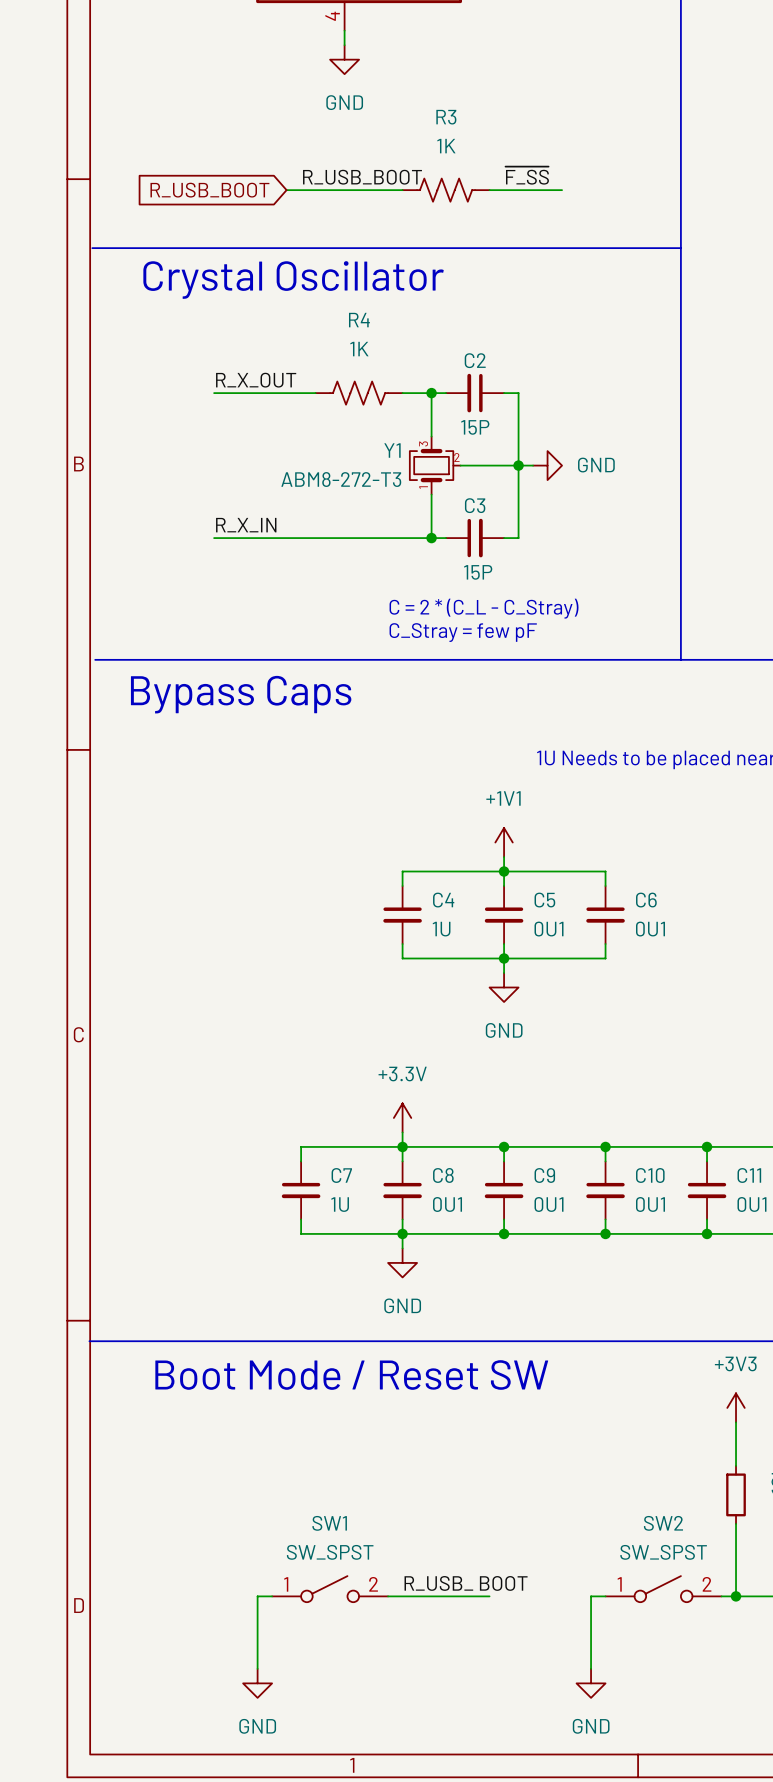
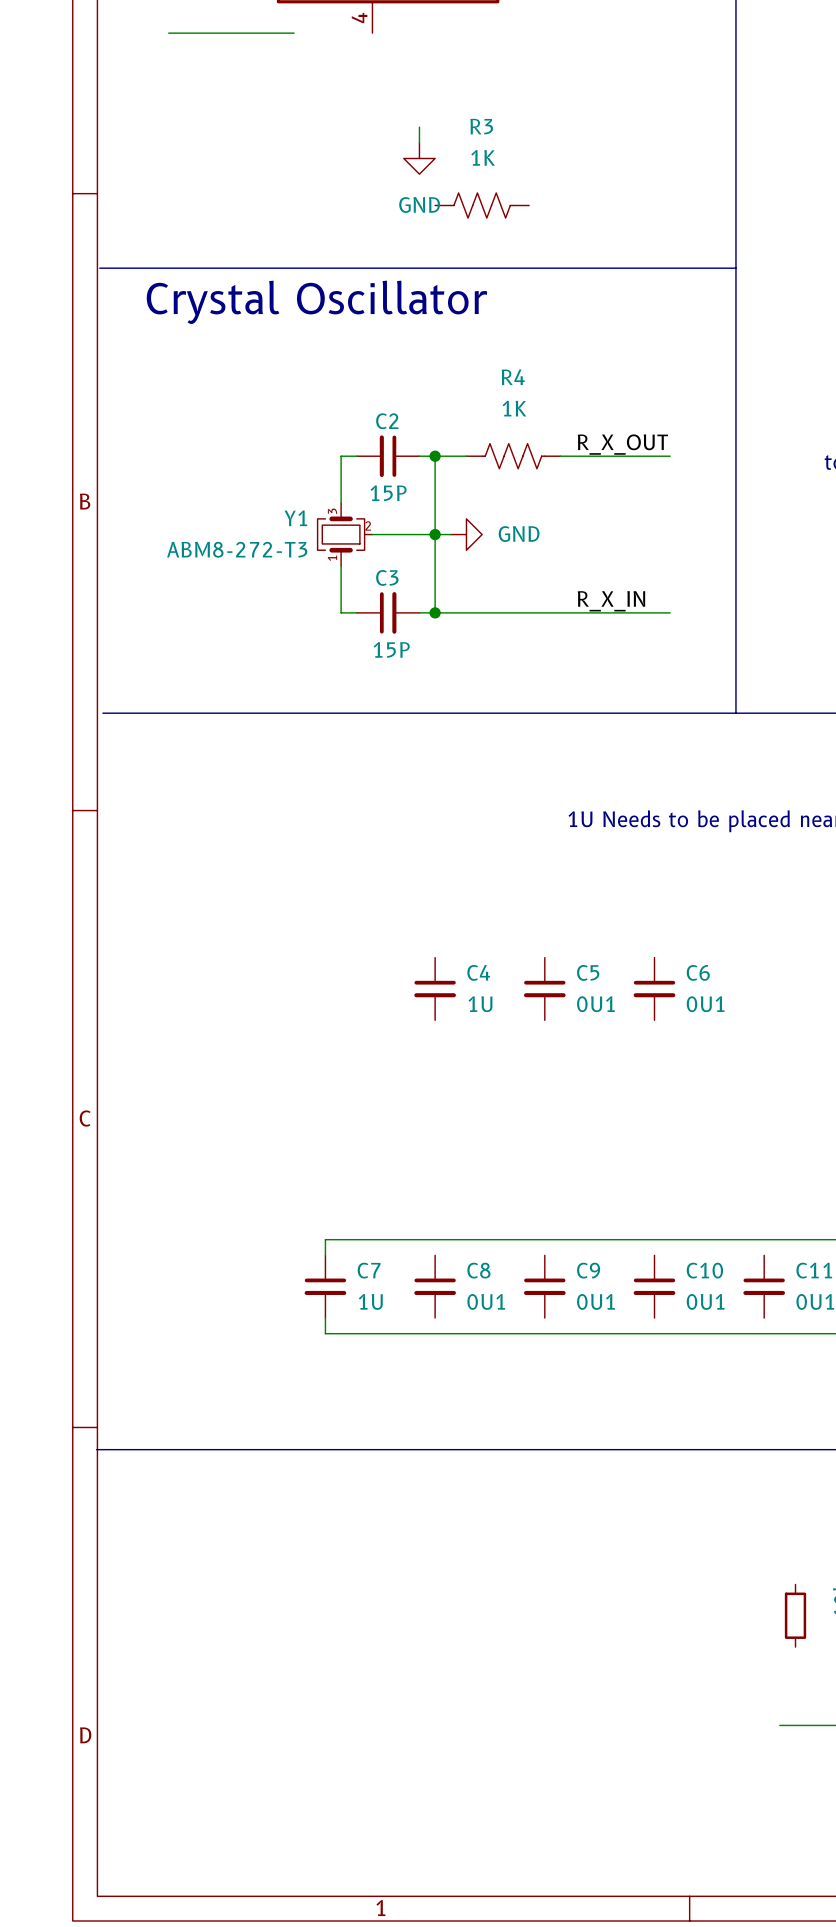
wire: (344, 30) (344, 45) -> (419, 127) (419, 142)
power symbol position: GND (344, 59) -> GND (419, 158)
label: ~{F_SS} (527, 175) -> none
label: R_USB_BOOT (362, 177) -> none
global label: R_USB_BOOT (209, 190) -> none
wire: (286, 190) (402, 190) -> (168, 33) (294, 33)
wire: (489, 190) (562, 190) -> none
label: R_X_OUT (256, 380) -> none
wire: (214, 393) (315, 393) -> none
R4 position: (359, 393) -> (513, 456)
wire: (402, 393) (446, 393) -> (419, 456) (466, 456)
wire: (431, 393) (431, 436) -> none
junction position: (431, 393) -> (435, 456)
C2 position: (475, 393) -> (388, 456)
wire: (504, 393) (518, 393) (518, 538) (504, 538) -> none
label: none -> R_X_OUT (622, 444)
wire: none -> (356, 456) (341, 456) (341, 503)
wire: none -> (435, 456) (435, 612)
wire: none -> (560, 456) (670, 456)
Y1 position: (435, 465) -> (345, 534)
wire: (460, 465) (533, 465) -> (372, 534) (450, 534)
junction: (518, 465) -> none
power symbol position: GND (547, 465) -> GND (466, 534)
junction: none -> (435, 534)
wire: (431, 494) (431, 538) -> none
wire: none -> (341, 565) (341, 612) (356, 612)
label: R_X_IN (246, 525) -> none
wire: (214, 538) (446, 538) -> (419, 612) (670, 612)
junction: (431, 538) -> none
C3 position: (475, 538) -> (388, 612)
label: none -> R_X_IN (611, 601)
junction: none -> (435, 612)
text: C = 2 * (C_L - C_Stray) (484, 608) -> none
text: C_Stray = few pF (463, 632) -> none
text: Bypass Caps (241, 694) -> none
power symbol: +1V1 (504, 842) -> none
wire: (504, 857) (504, 886) -> none
junction: (504, 871) -> none
wire: (402, 886) (402, 871) (605, 871) (605, 886) -> none
wire: (402, 944) (402, 958) (605, 958) (605, 944) -> none
wire: (504, 944) (504, 972) -> none
junction: (504, 958) -> none
power symbol: GND (504, 987) -> none
power symbol: +3.3V (402, 1117) -> none
wire: (402, 1132) (402, 1161) -> none
junction: (402, 1146) -> none
wire: (504, 1146) (504, 1161) -> none
junction: (504, 1146) -> none
wire: (605, 1146) (605, 1161) -> none
junction: (605, 1146) -> none
wire: (707, 1146) (707, 1161) -> none
junction: (707, 1146) -> none
wire: (402, 1219) (402, 1248) -> none
wire: (504, 1219) (504, 1233) -> none
wire: (605, 1219) (605, 1233) -> none
wire: (707, 1219) (707, 1233) -> none
junction: (402, 1233) -> none
junction: (504, 1233) -> none
junction: (605, 1233) -> none
junction: (707, 1233) -> none
power symbol: GND (402, 1262) -> none
text: Boot Mode / Reset SW (351, 1375) -> none
power symbol: +3V3 (736, 1407) -> none
wire: (736, 1422) (736, 1465) -> none
wire: (736, 1523) (736, 1596) -> none
label: R_USB_ BOOT (466, 1583) -> none
SW1: SW_SPST (330, 1589) -> none
SW2: SW_SPST (663, 1589) -> none
wire: (272, 1596) (257, 1596) (257, 1668) -> none
wire: (388, 1596) (489, 1596) -> none
wire: (605, 1596) (591, 1596) (591, 1668) -> none
junction: (736, 1596) -> none
power symbol: GND (257, 1683) -> none
power symbol: GND (591, 1683) -> none

